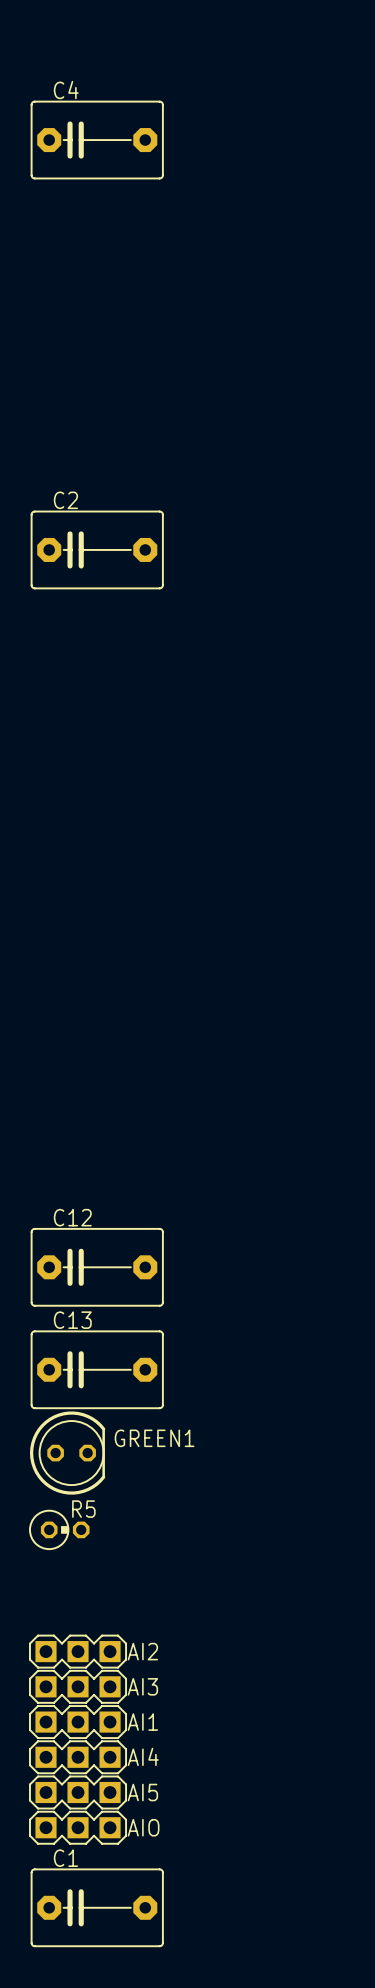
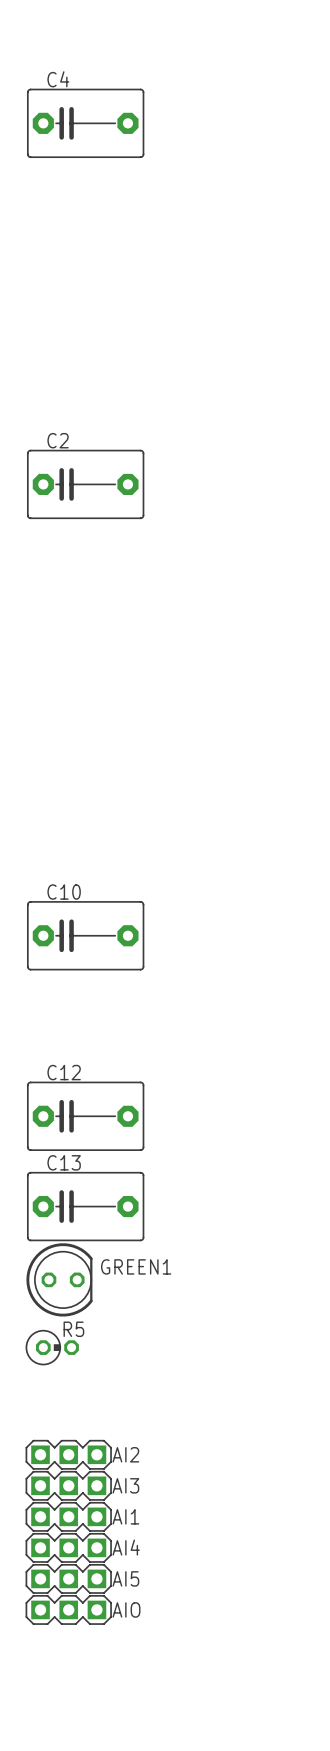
C10: none -> (85, 935)
C1: (97, 1907) -> none

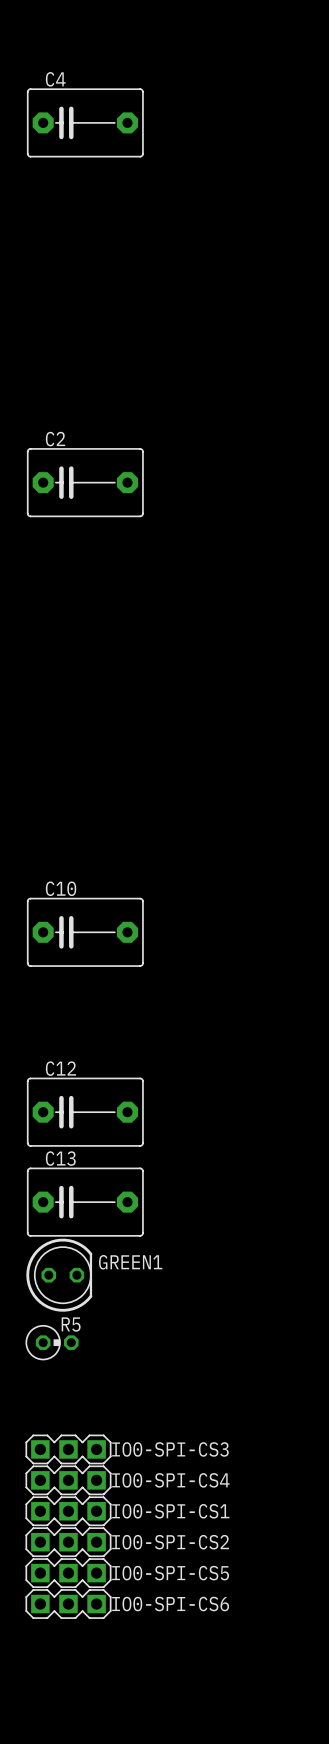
AI2 name: AI2 (125, 1454) -> IO0-SPI-CS3 (170, 1449)
AI3 name: AI3 (125, 1485) -> IO0-SPI-CS4 (170, 1480)
AI1 name: AI1 (125, 1516) -> IO0-SPI-CS1 (170, 1511)
AI4 name: AI4 (126, 1547) -> IO0-SPI-CS2 (170, 1542)
AI5 name: AI5 (125, 1578) -> IO0-SPI-CS5 (170, 1573)
AIO name: AIO (126, 1609) -> IO0-SPI-CS6 (170, 1604)

